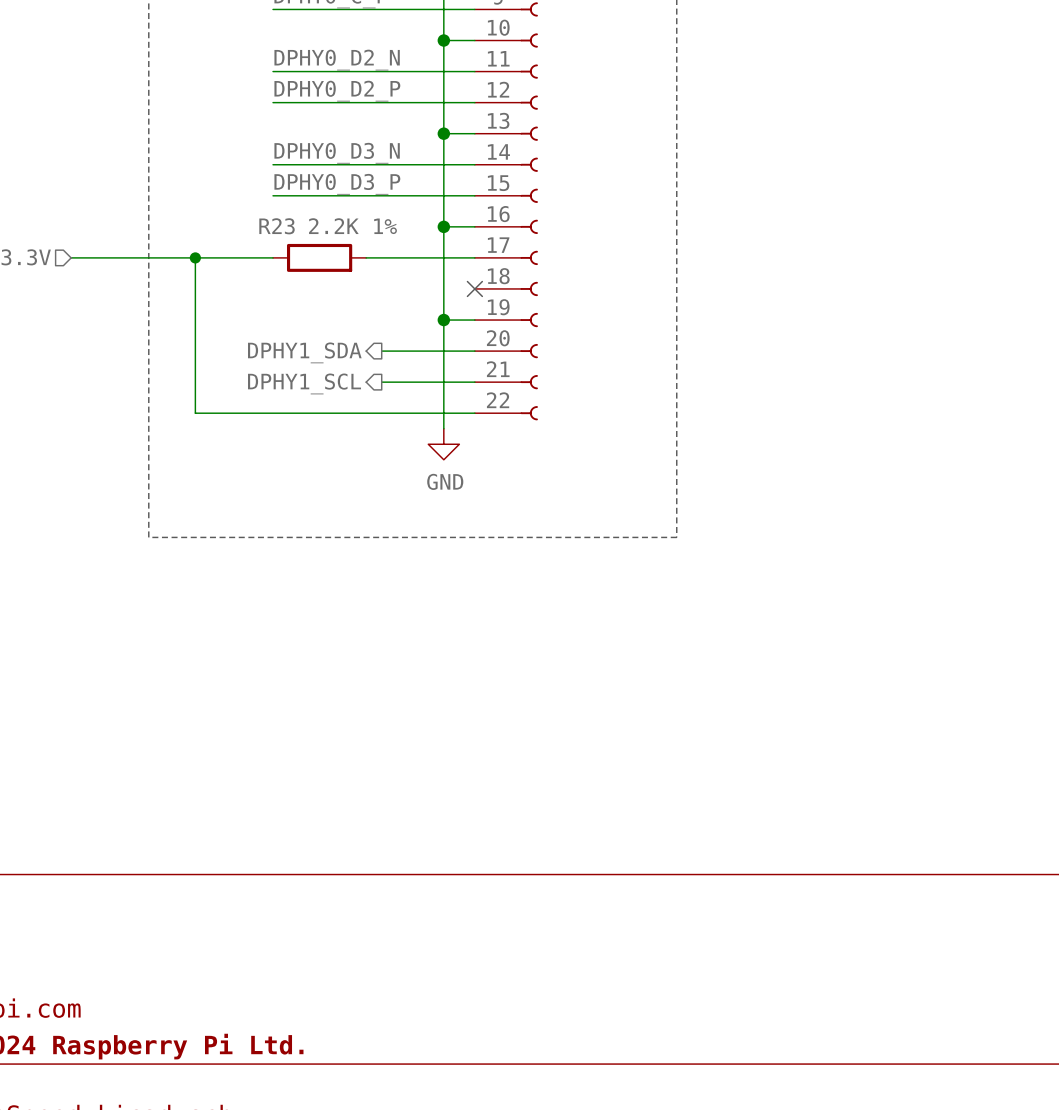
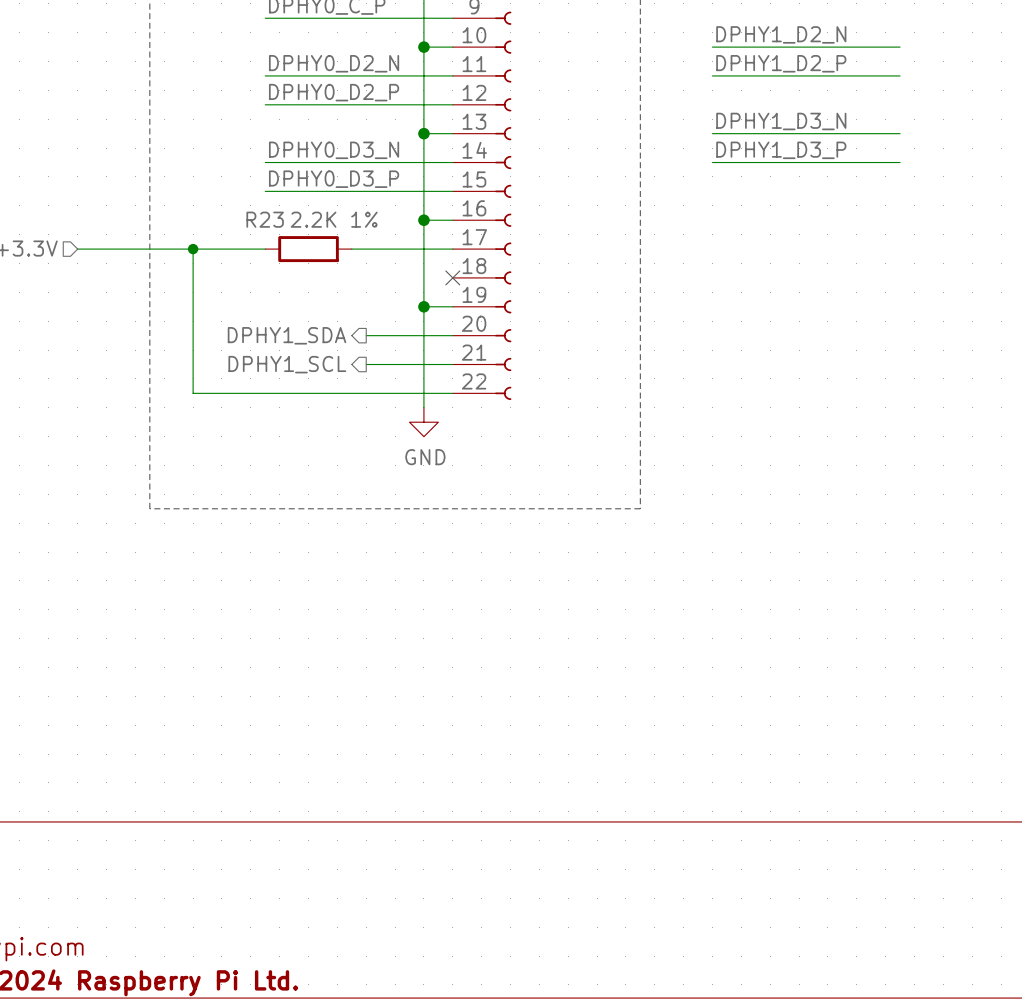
label: none -> DPHY1_D2_N (781, 34)
wire: none -> (712, 47) (900, 47)
label: none -> DPHY1_D2_P (781, 63)
wire: none -> (712, 75) (900, 75)
label: none -> DPHY1_D3_N (781, 121)
wire: none -> (712, 133) (900, 133)
label: none -> DPHY1_D3_P (781, 150)
wire: none -> (712, 162) (900, 162)

